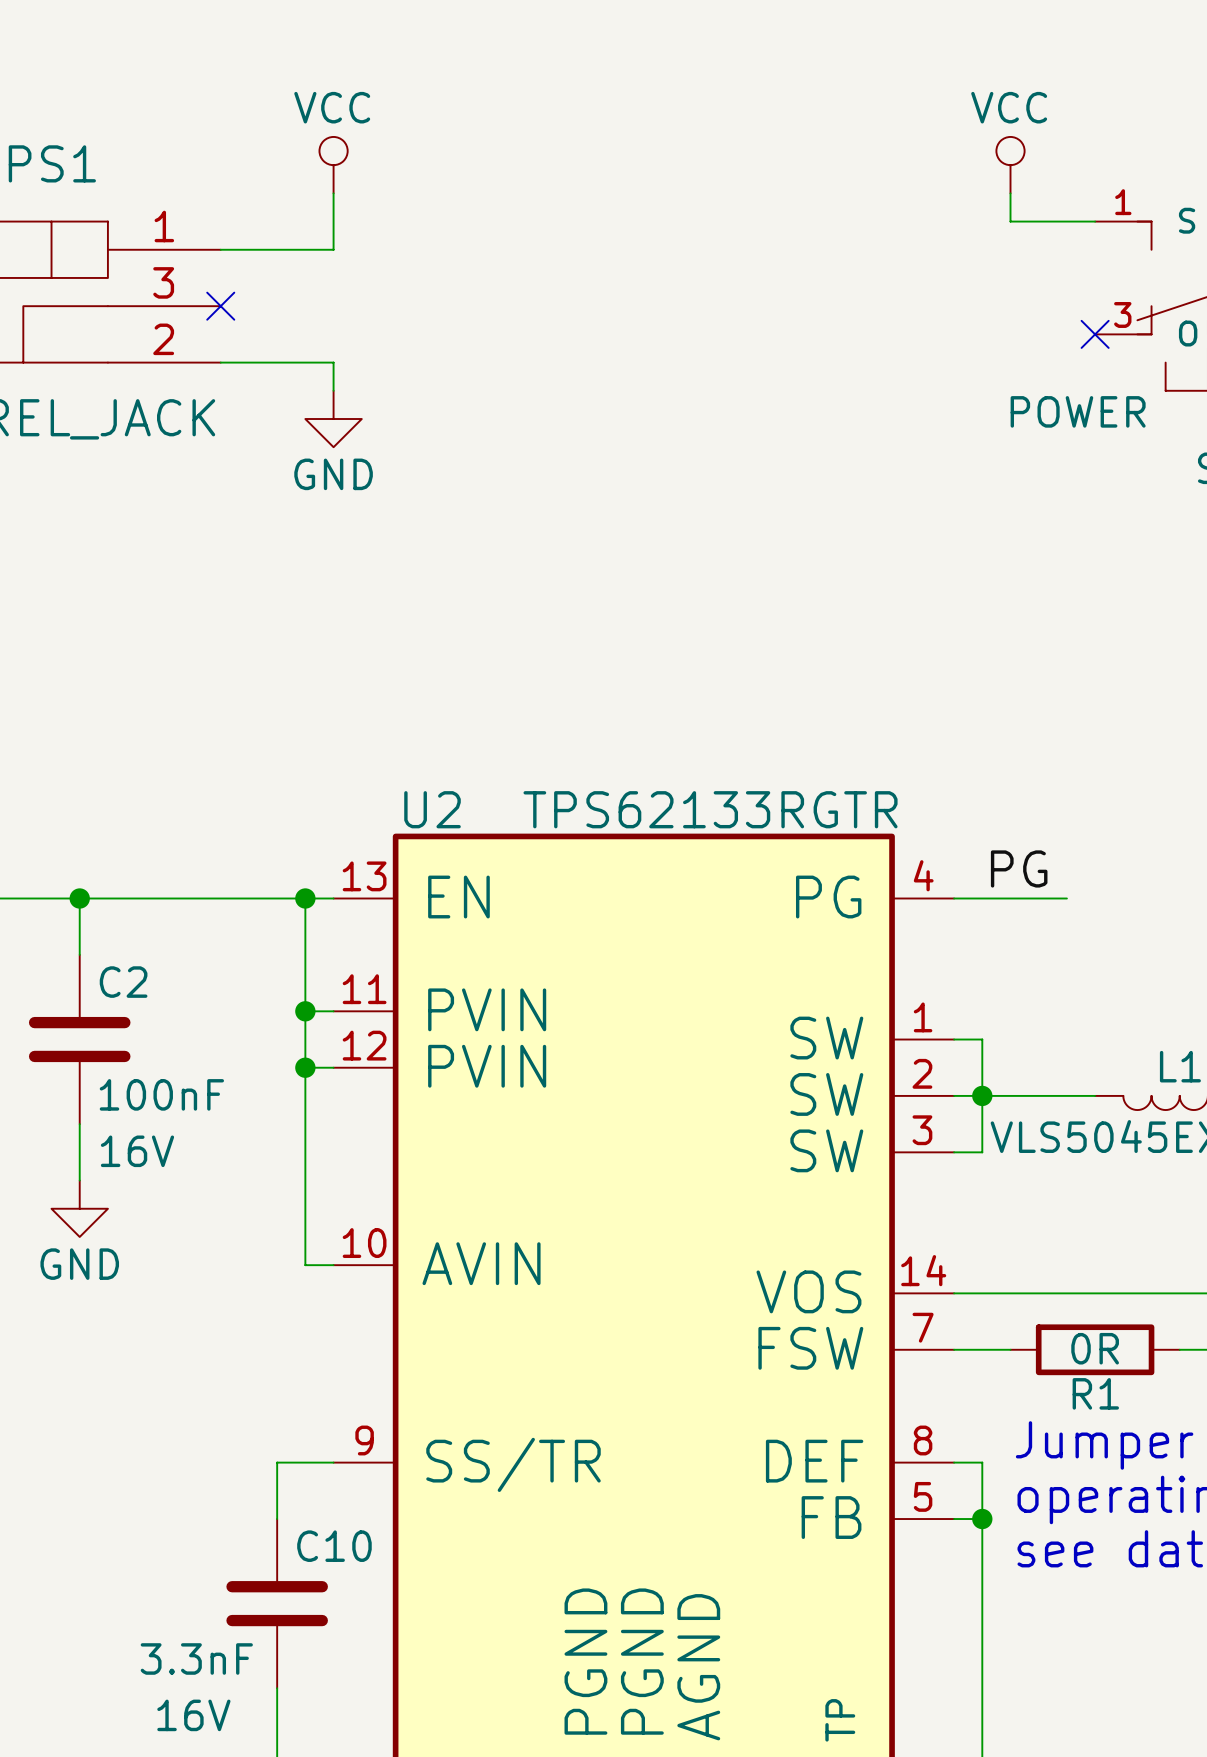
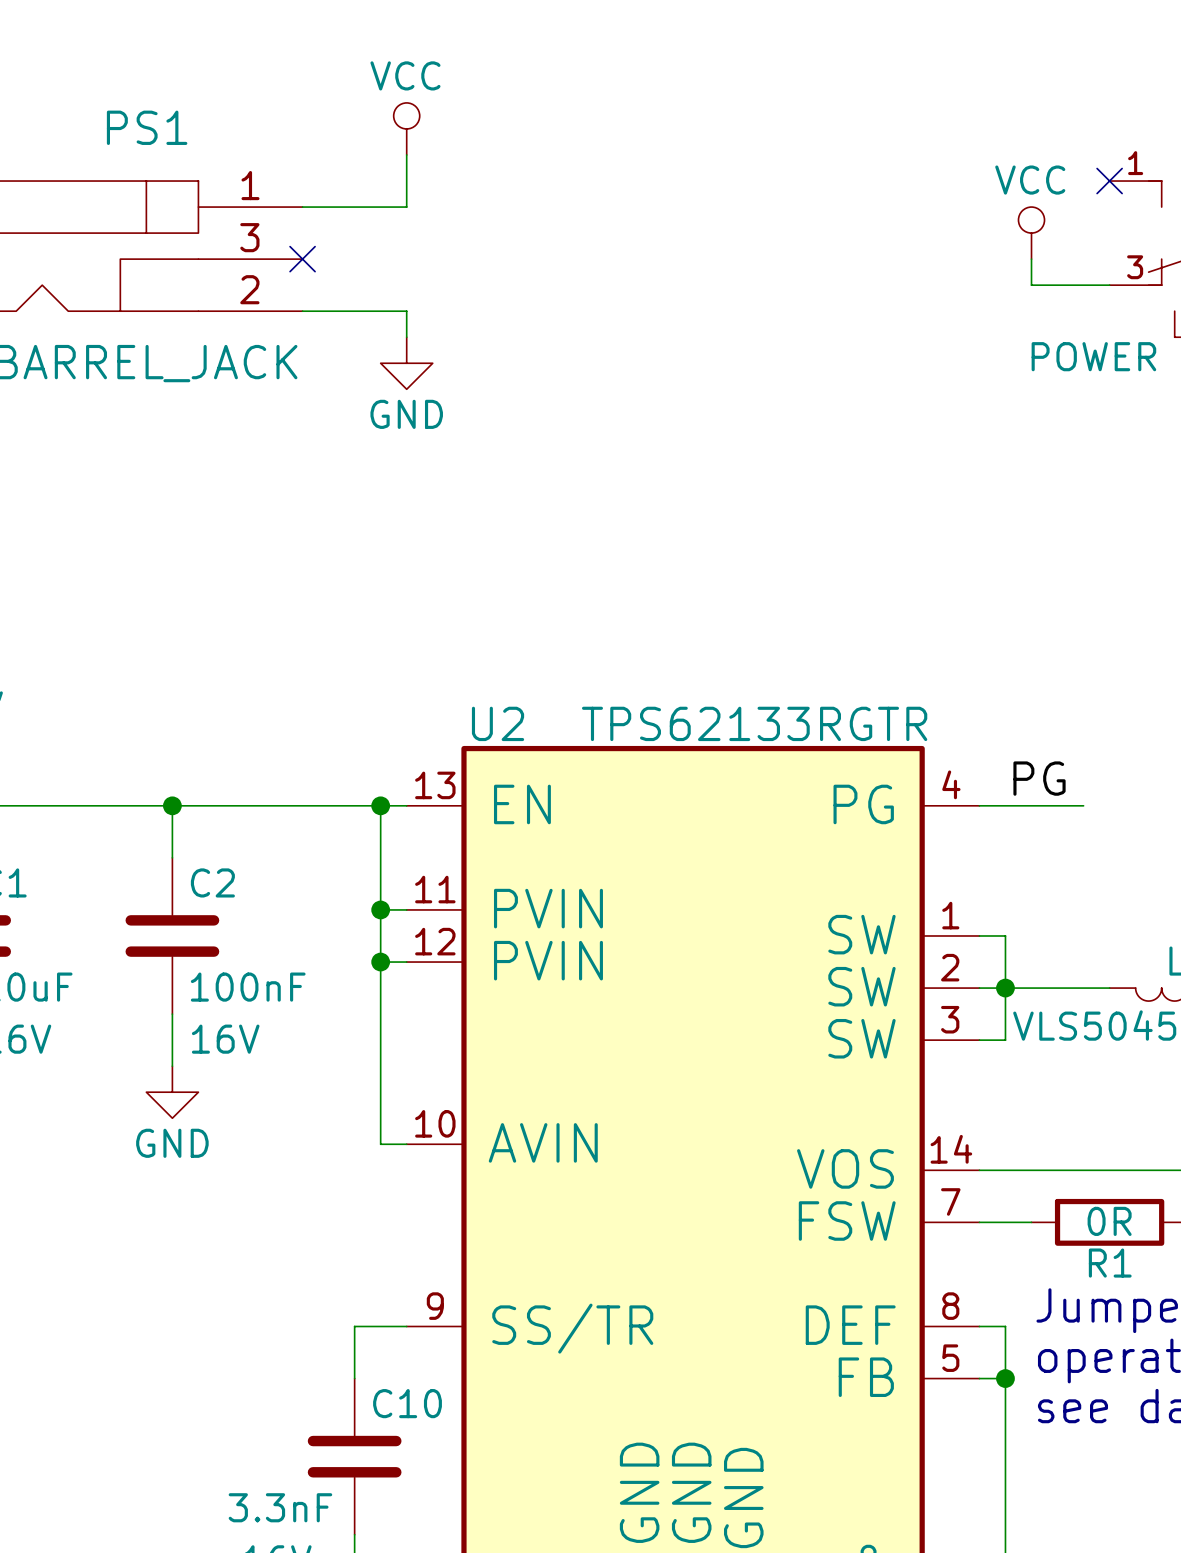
power symbol position: VCC (1010, 165) -> VCC (1031, 233)
wire: (1010, 193) (1010, 221) (1095, 221) -> (1031, 259) (1031, 285) (1109, 285)
no-connect mark position: (1095, 334) -> (1109, 181)

